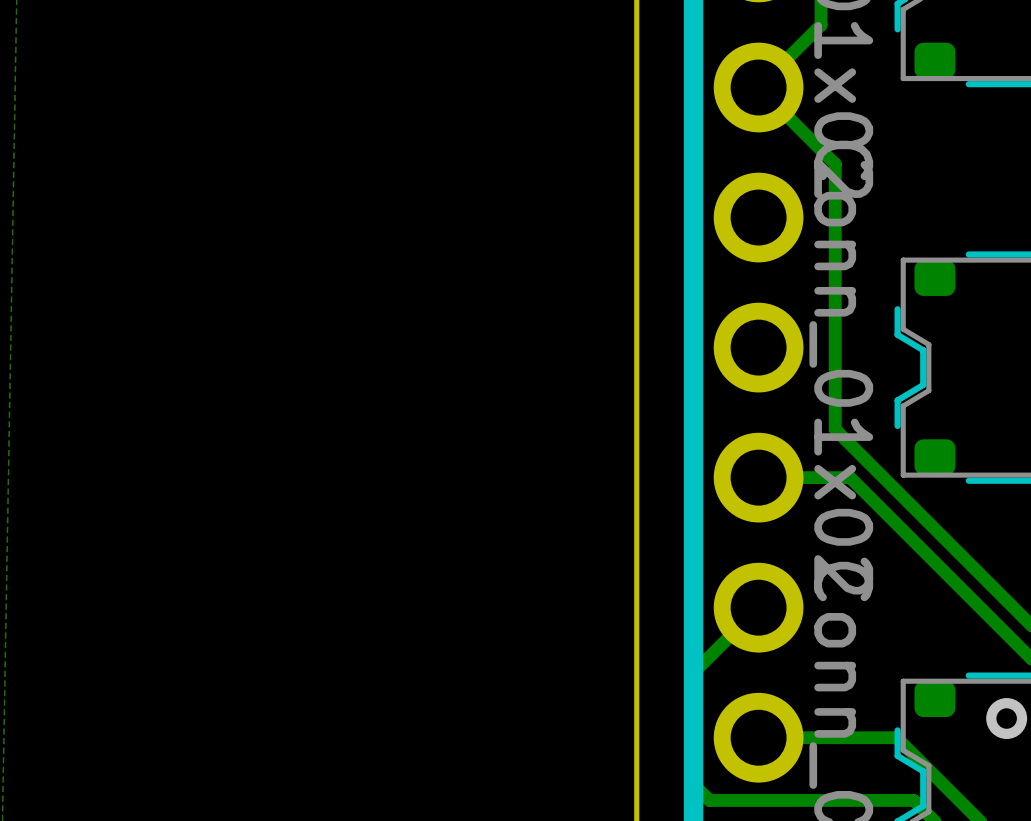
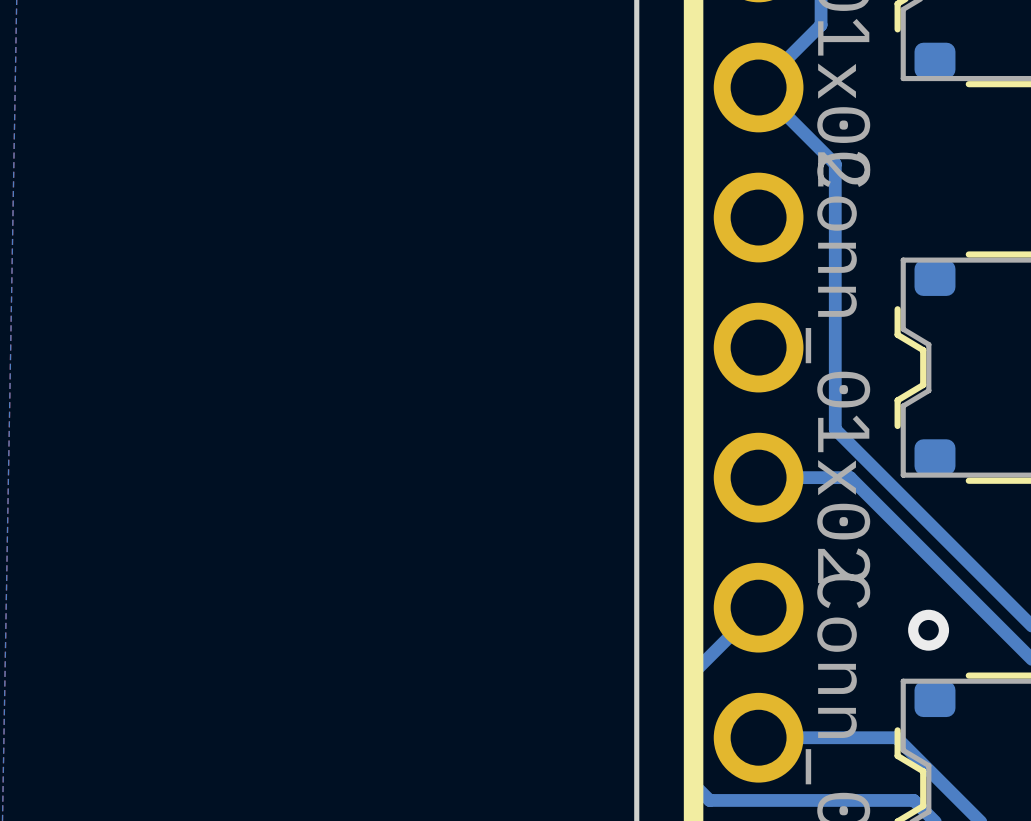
via position: (1006, 718) -> (928, 630)

